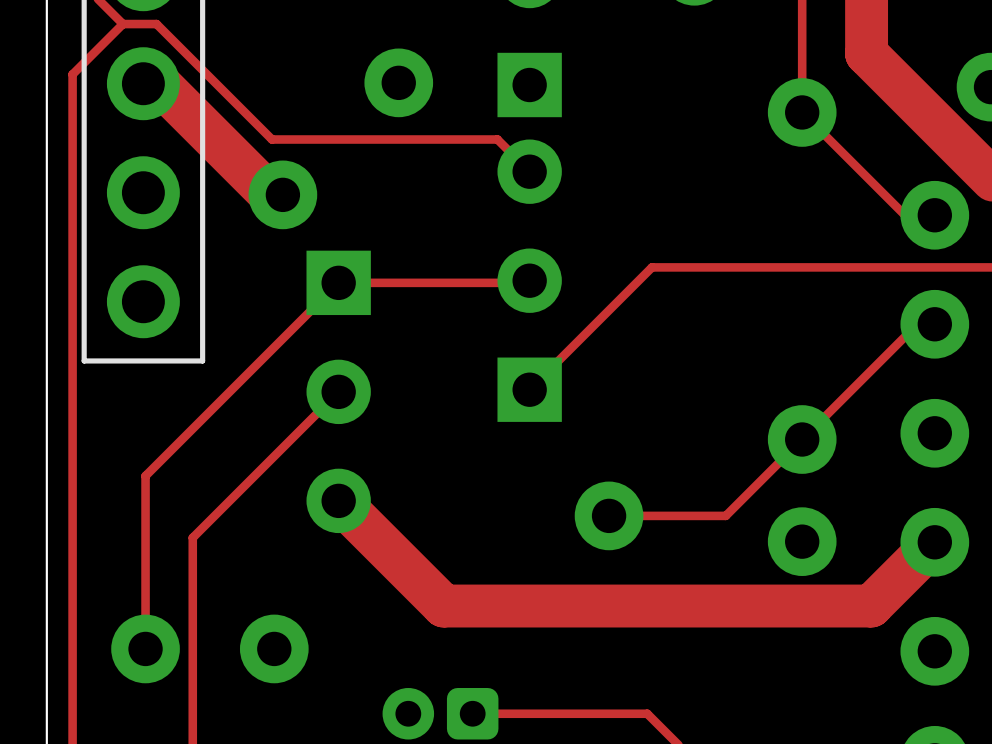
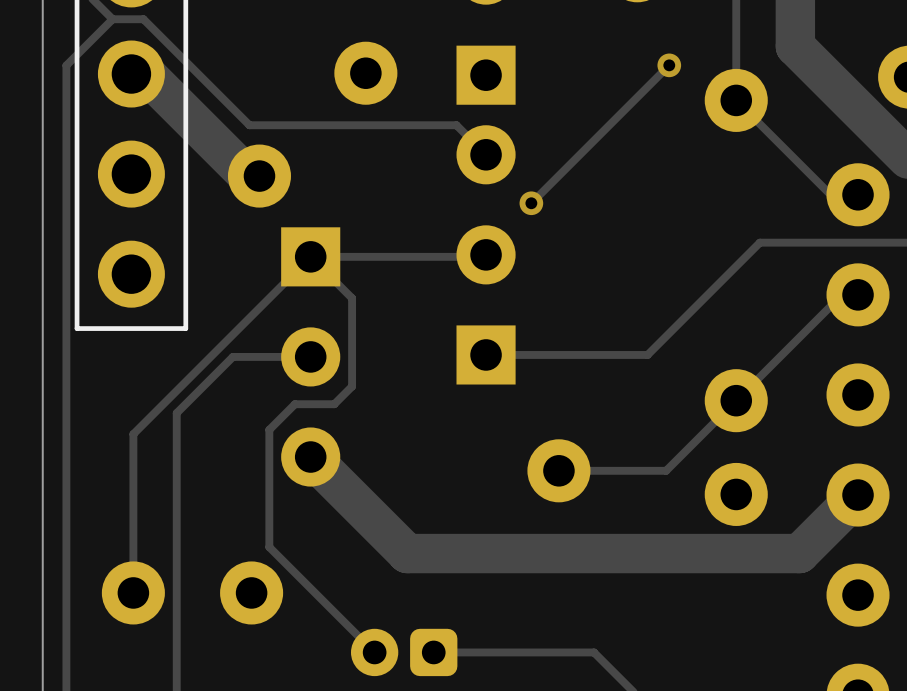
track: none -> (669, 65) (531, 203)
via: none -> (669, 65)
via: none -> (531, 203)
track: (827, 267) (651, 267) (529, 389) -> (759, 242) (647, 354) (486, 354)
track: none -> (310, 256) (352, 298) (352, 386) (334, 404) (294, 404) (269, 429) (269, 547) (374, 652)
track: (338, 391) (192, 537) -> (310, 356) (232, 356) (176, 413) (176, 490)

